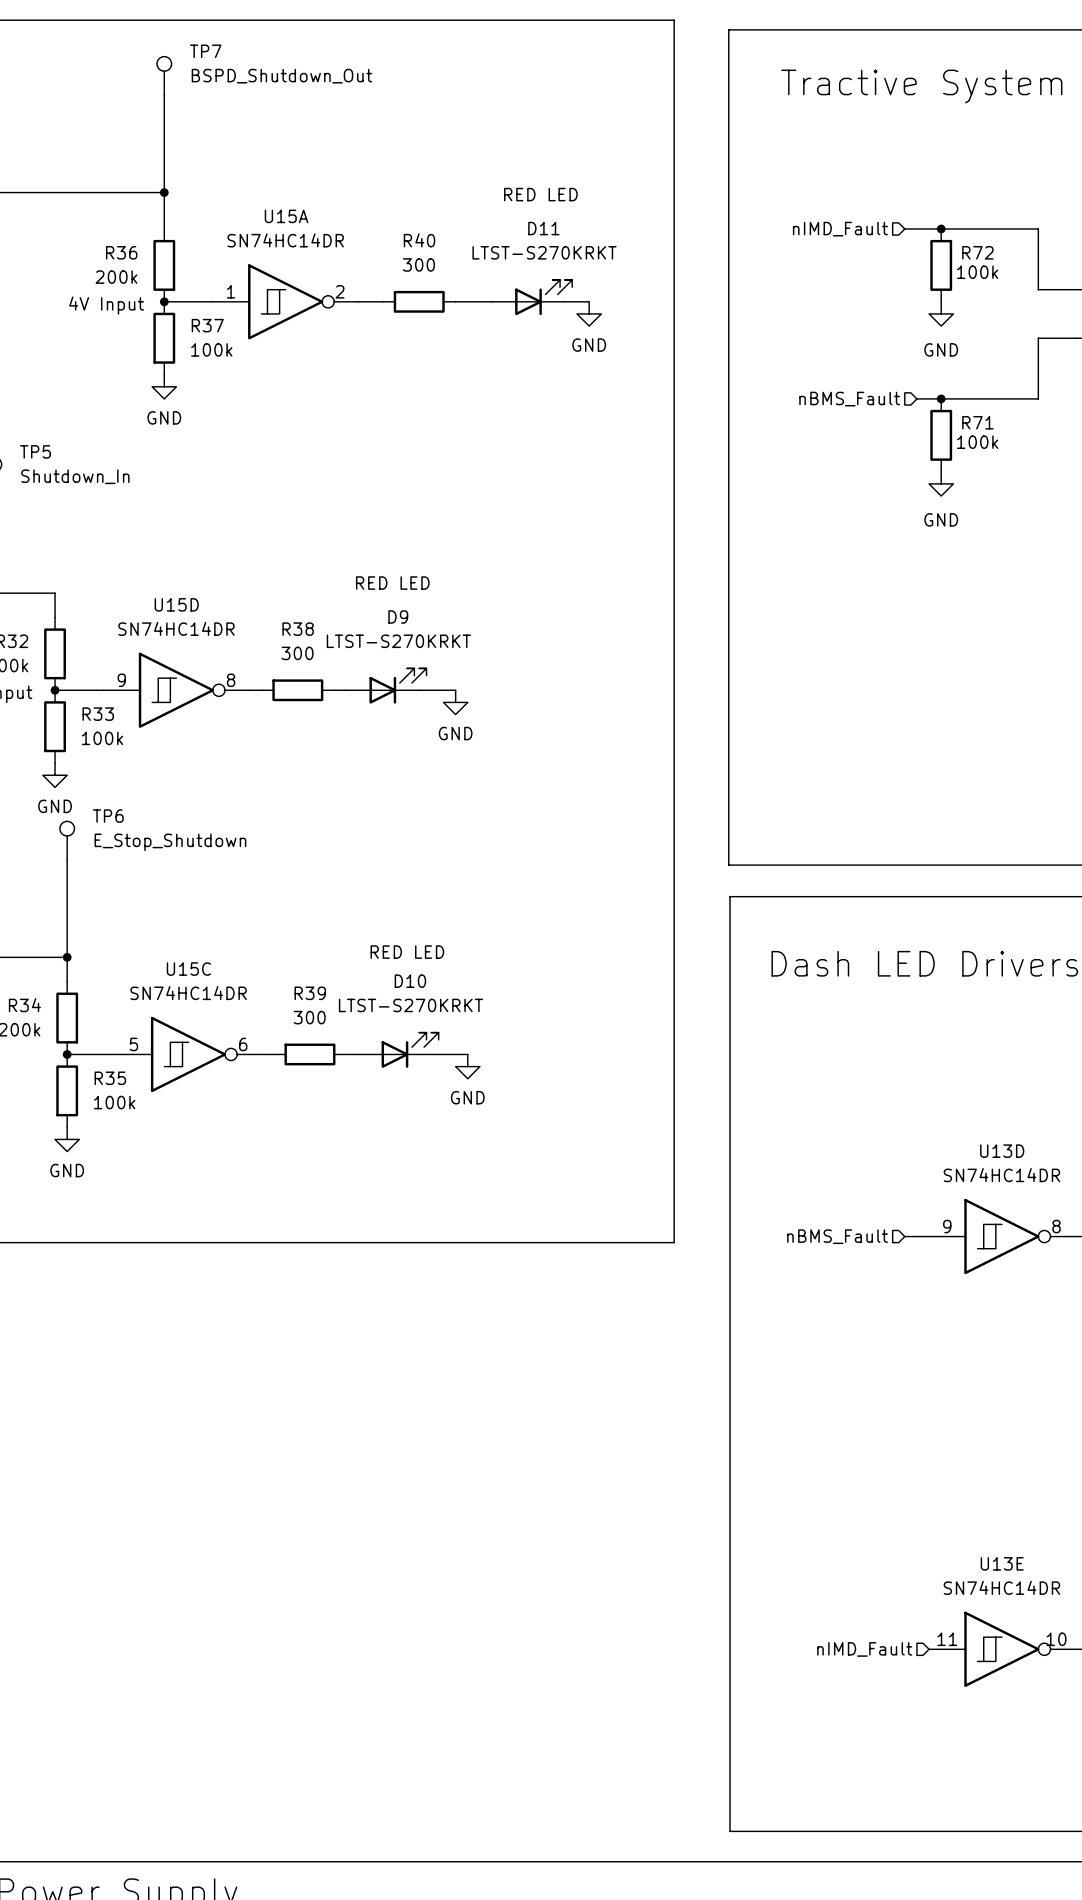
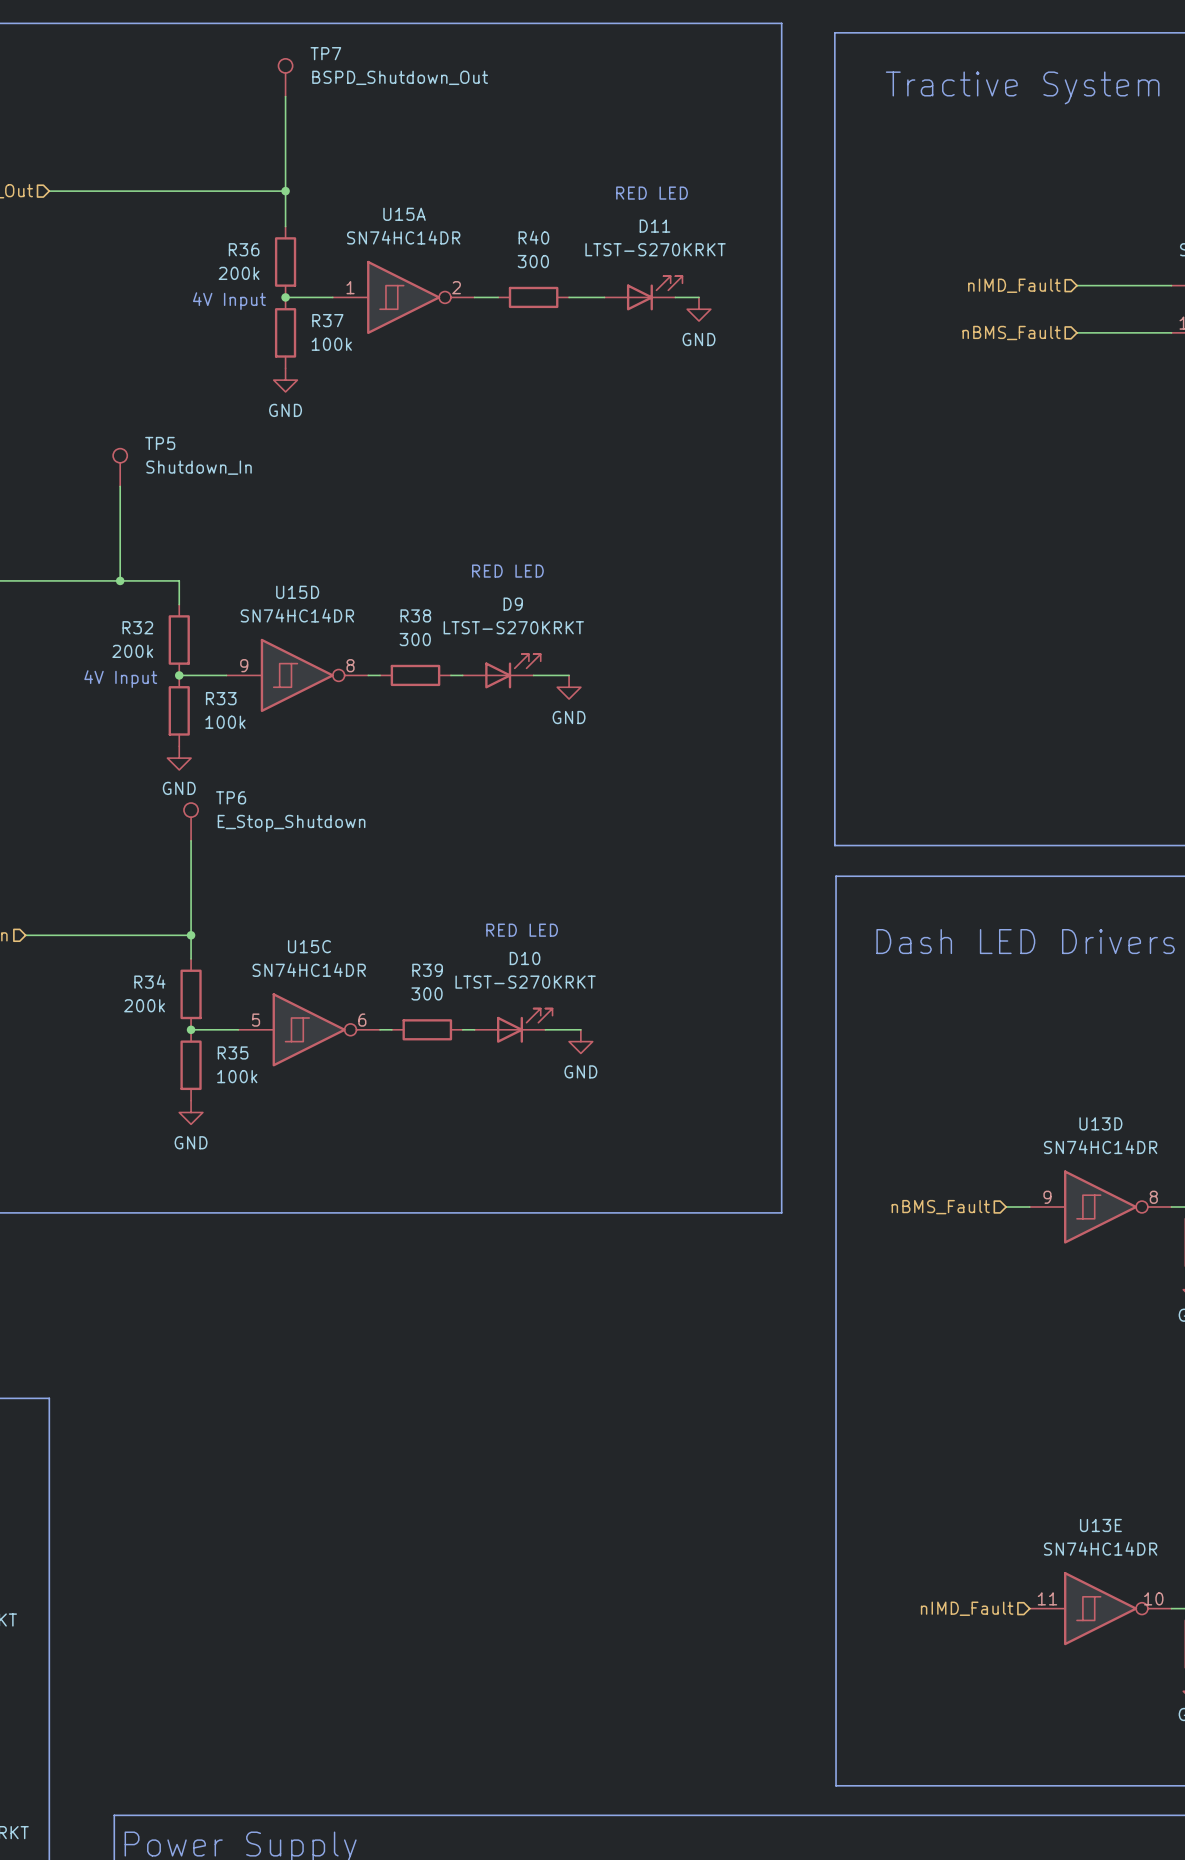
wire: (904, 228) (1038, 228) (1038, 289) -> (1077, 285) (1136, 285)
junction: (941, 228) -> none
hierarchical label position: nIMD_Fault (840, 229) -> nIMD_Fault (1014, 285)
R72: 100k (941, 265) -> none
power symbol: GND (941, 313) -> none
wire: (1038, 338) (1038, 398) (916, 398) -> (1136, 332) (1077, 332)
junction: (941, 398) -> none
hierarchical label position: nBMS_Fault (849, 399) -> nBMS_Fault (1011, 332)
R71: 100k (941, 435) -> none
power symbol: GND (941, 483) -> none

